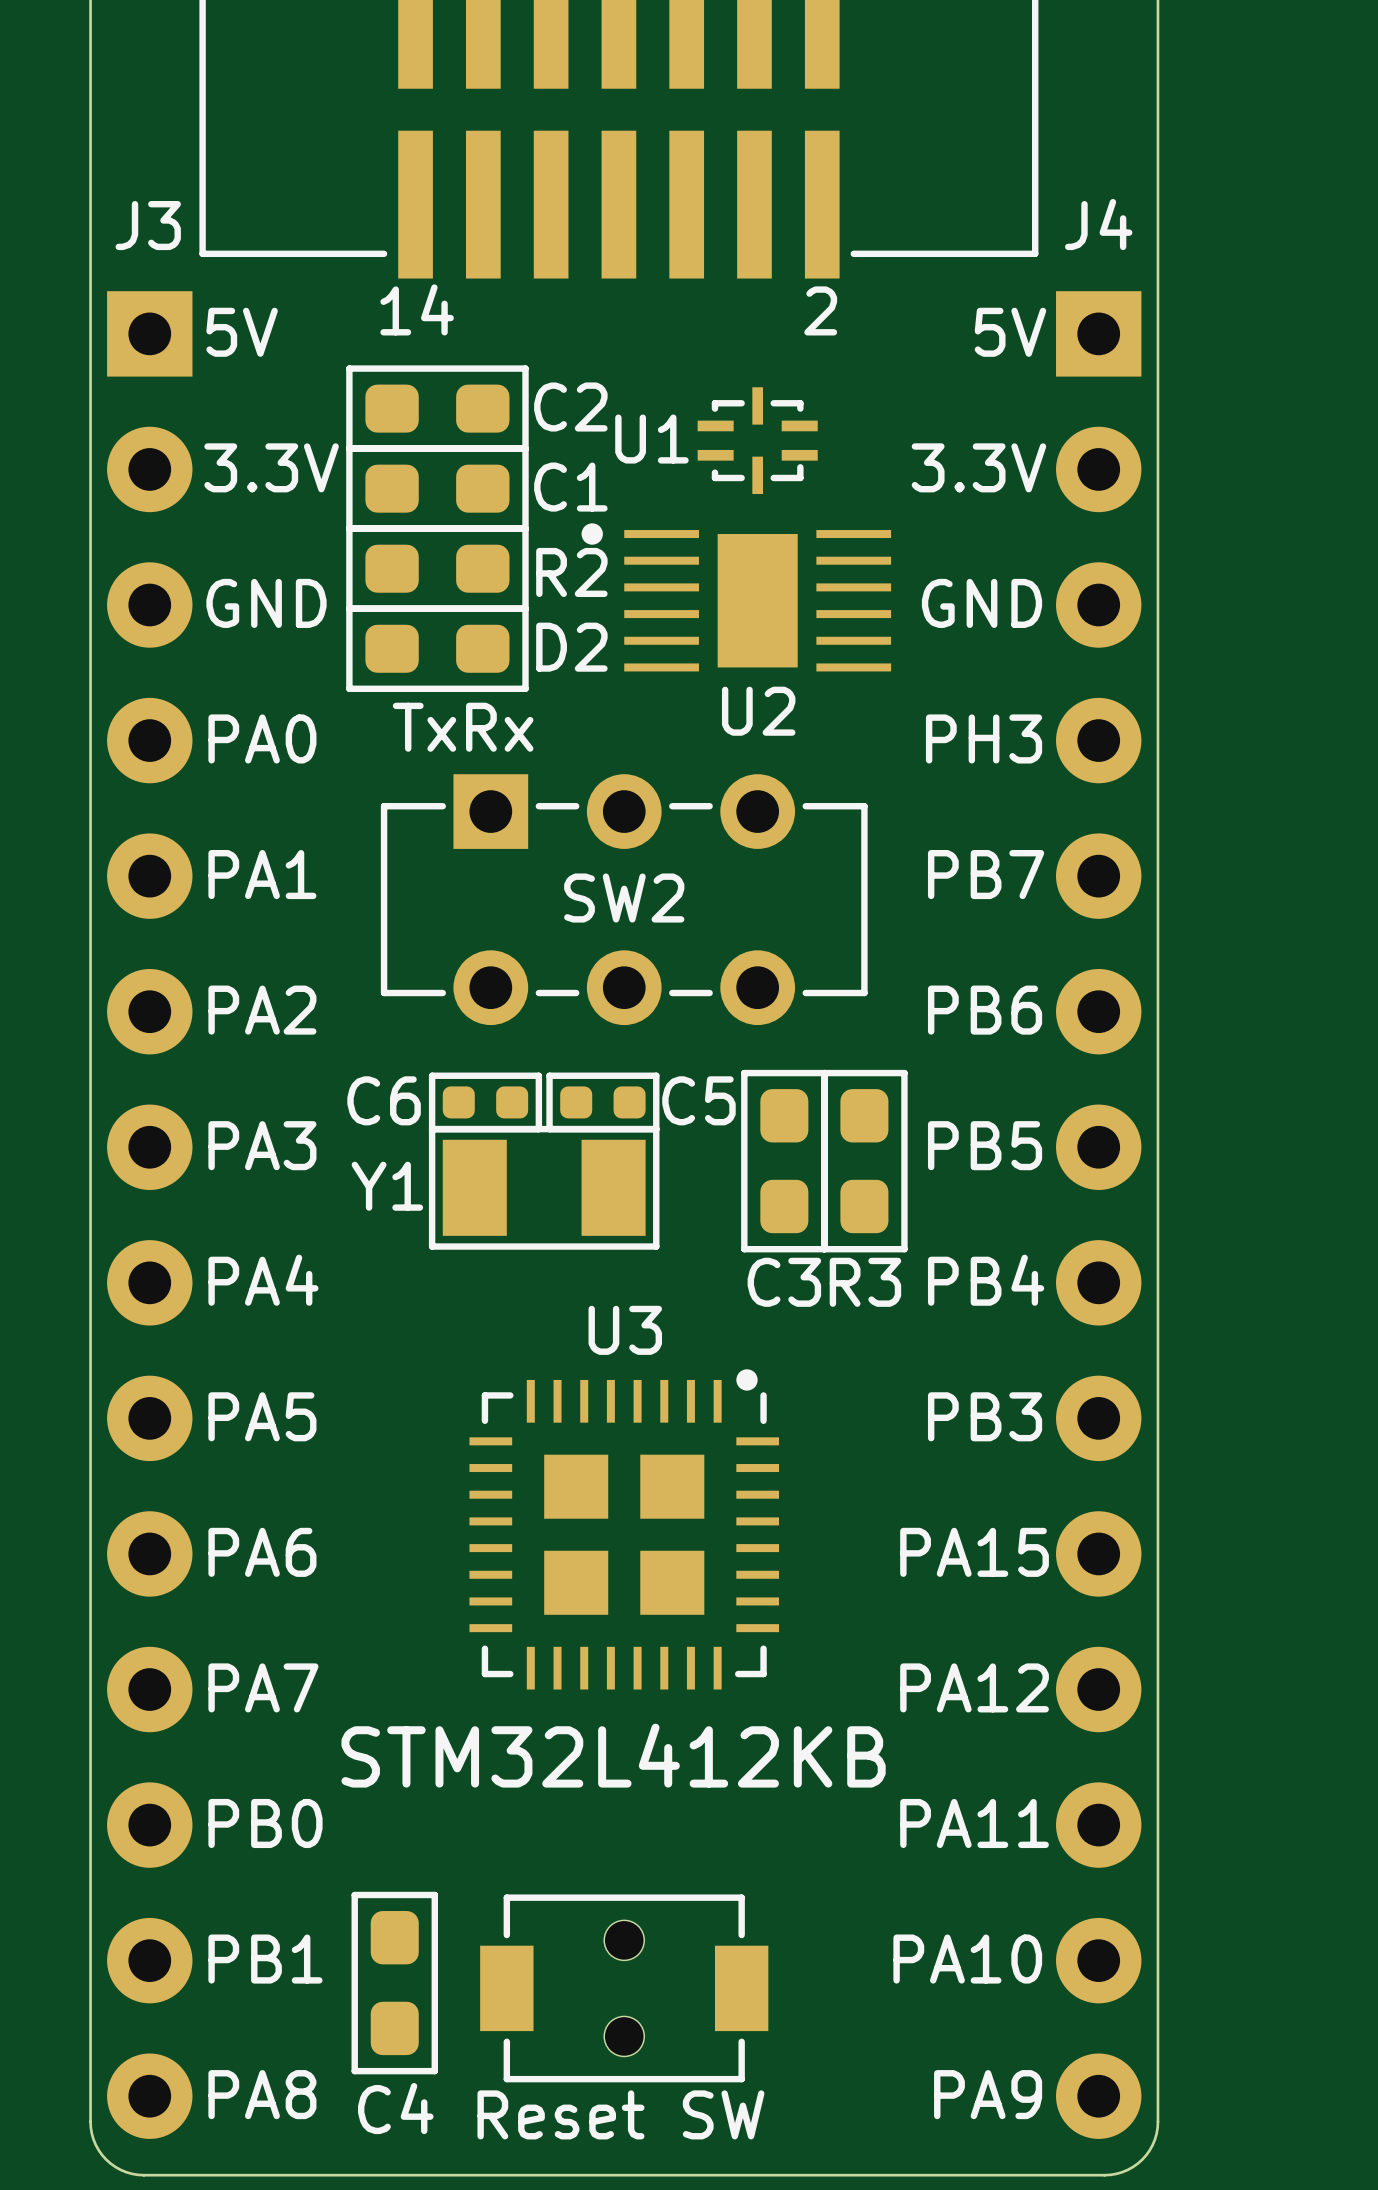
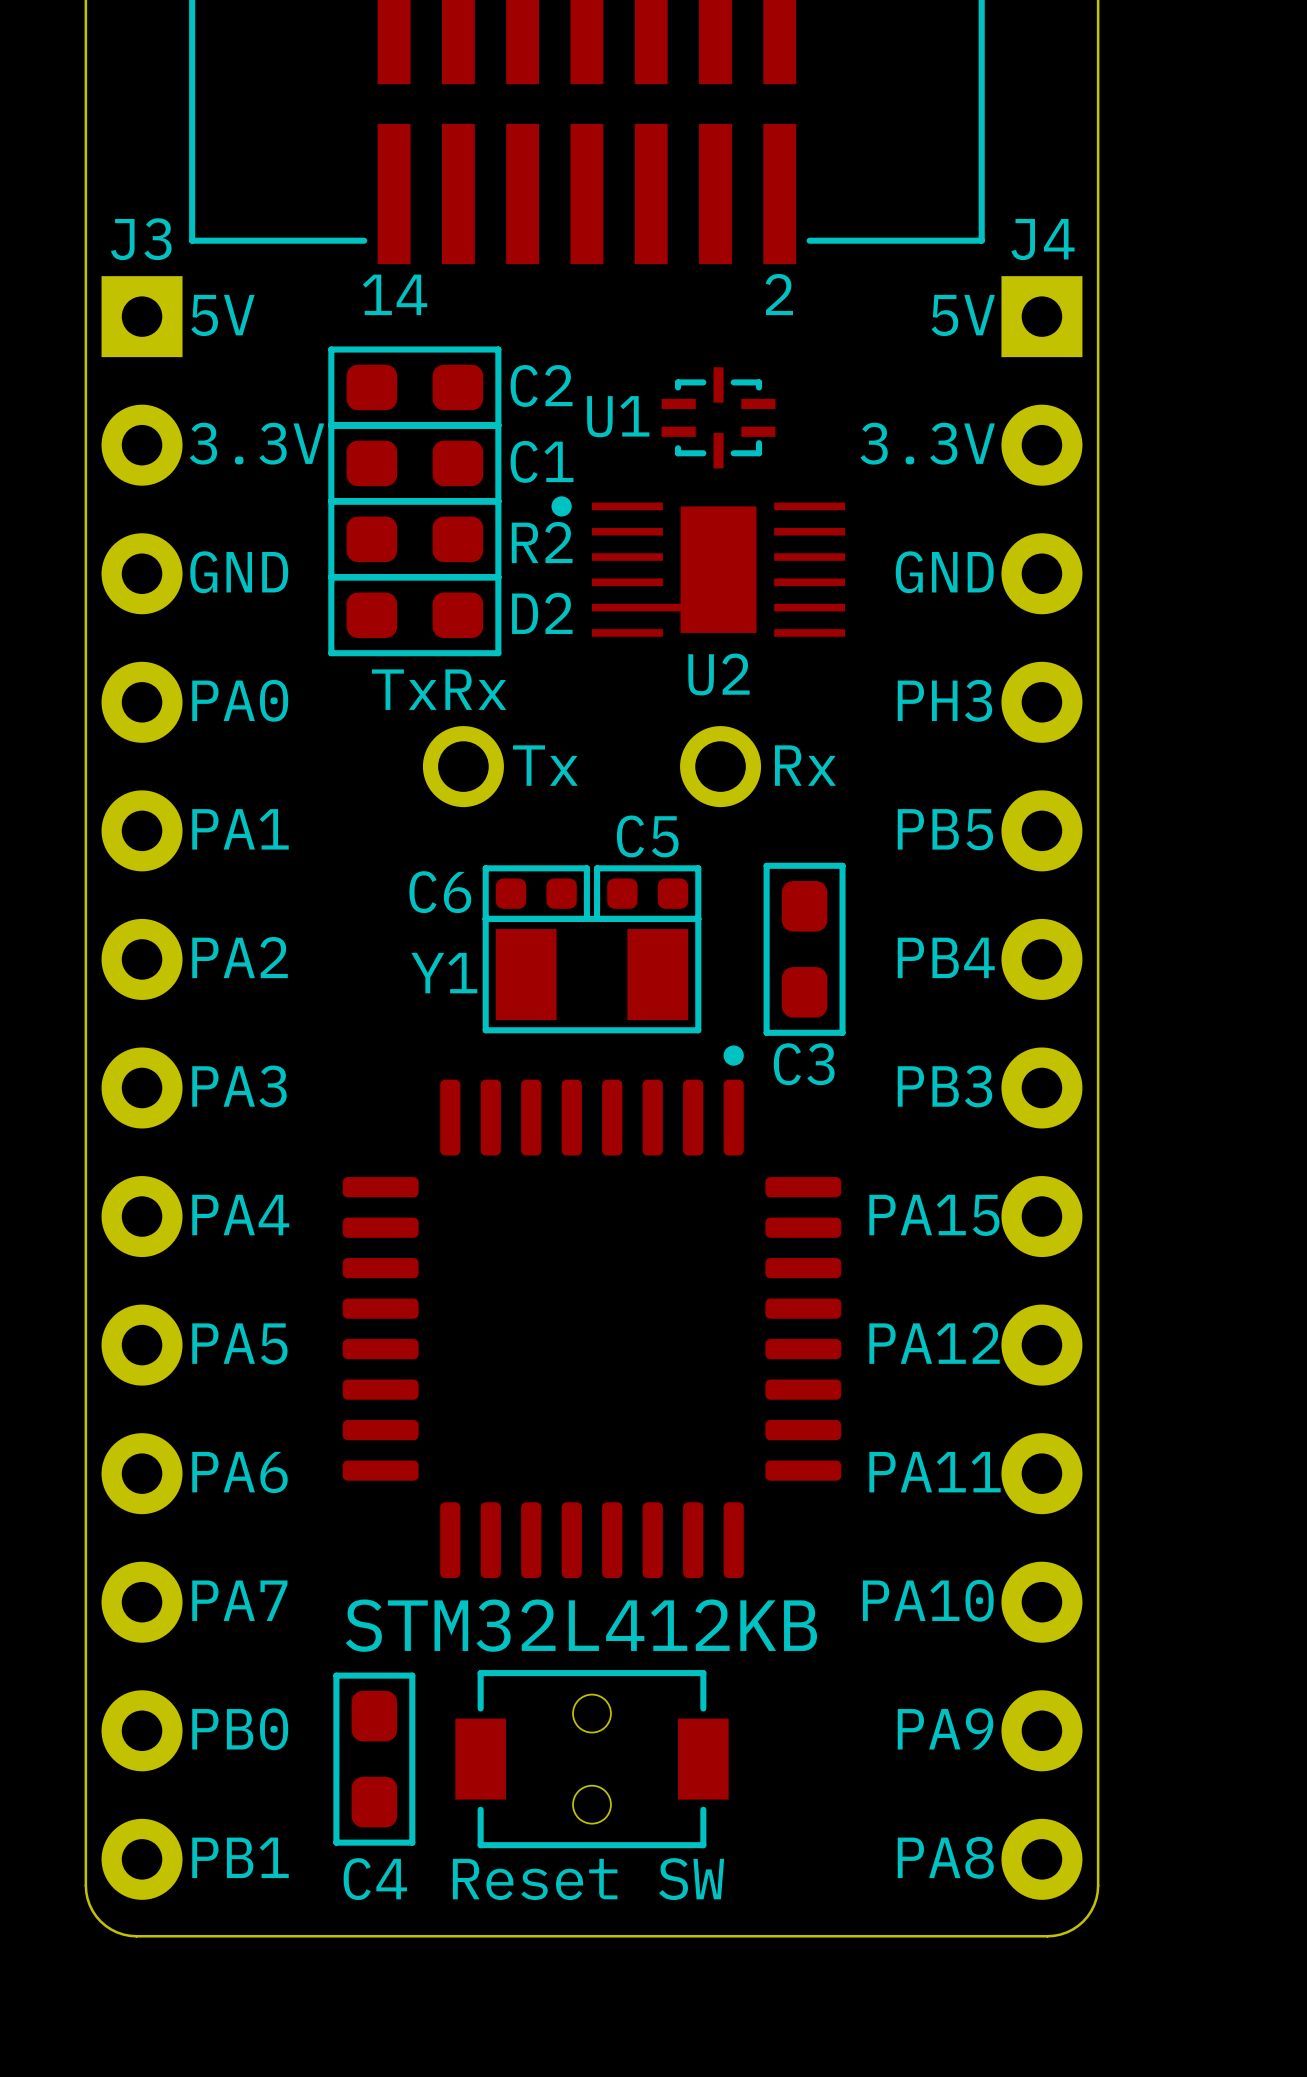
J3 footprint: [107, 291, 193, 2139] -> [101, 276, 183, 1900]
J4 footprint: [1056, 291, 1142, 2139] -> [1001, 276, 1083, 1900]
U2 footprint: [581, 523, 892, 672] -> [551, 496, 846, 637]
text: none -> Tx (545, 765)
text: none -> Rx (805, 765)
part: none -> (463, 766)
part: none -> (720, 766)
text: PB7 (986, 874) -> PB5 (945, 829)
SW2: (624, 899) -> none
text: PB6 (985, 1010) -> PB4 (946, 957)
C5 name position: C5 (698, 1100) -> C5 (647, 836)
C6 position: (485, 1102) -> (536, 893)
C5 position: (602, 1102) -> (647, 893)
text: PB5 (985, 1145) -> PB3 (944, 1086)
C3 position: (784, 1161) -> (804, 949)
R3: (864, 1161) -> none
Y1 position: (544, 1187) -> (591, 974)
text: PB4 (986, 1280) -> PA15 (934, 1215)
part: none -> (591, 1311)
text: PB3 (985, 1416) -> none
U3: (624, 1529) -> none
text: PA15 (974, 1552) -> PA11 (935, 1472)
text: none -> PA10 (928, 1600)
text position: PA12 (974, 1687) -> PA12 (934, 1343)
text position: STM32L412KB (613, 1755) -> STM32L412KB (581, 1625)
text: PA11 (974, 1823) -> none
text: PA10 (967, 1959) -> PA8 (945, 1857)
C4 position: (394, 1983) -> (374, 1759)
board edge: (90, 1988) (91, 2133) (98, 2150) (110, 2163) (126, 2172) (143, 2175) (1116, 2173) (1127, 2169) (1142, 2159) (1152, 2144) (1156, 2133) (1157, 1988) -> (85, 1885) (89, 1905) (100, 1921) (117, 1932) (136, 1936) (1047, 1936) (1066, 1932) (1083, 1921) (1094, 1905) (1098, 1885)
part position: (624, 1988) -> (591, 1759)
text: PA8 (262, 2094) -> none
text position: PA9 (988, 2094) -> PA9 (945, 1728)
text position: Reset SW (620, 2114) -> Reset SW (588, 1879)

